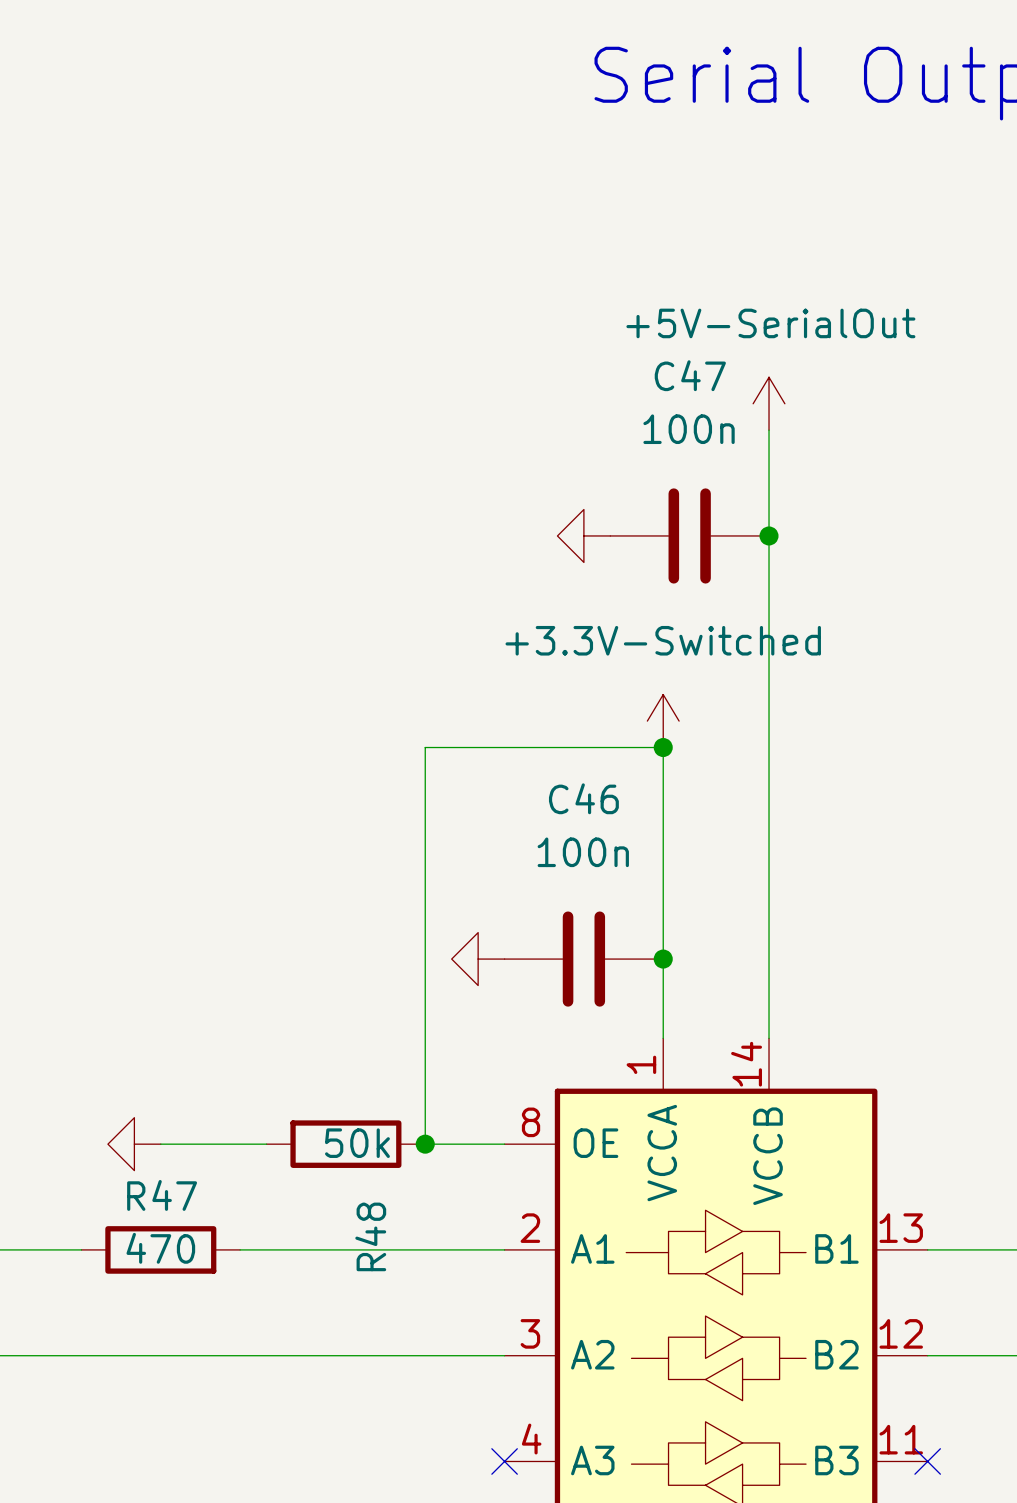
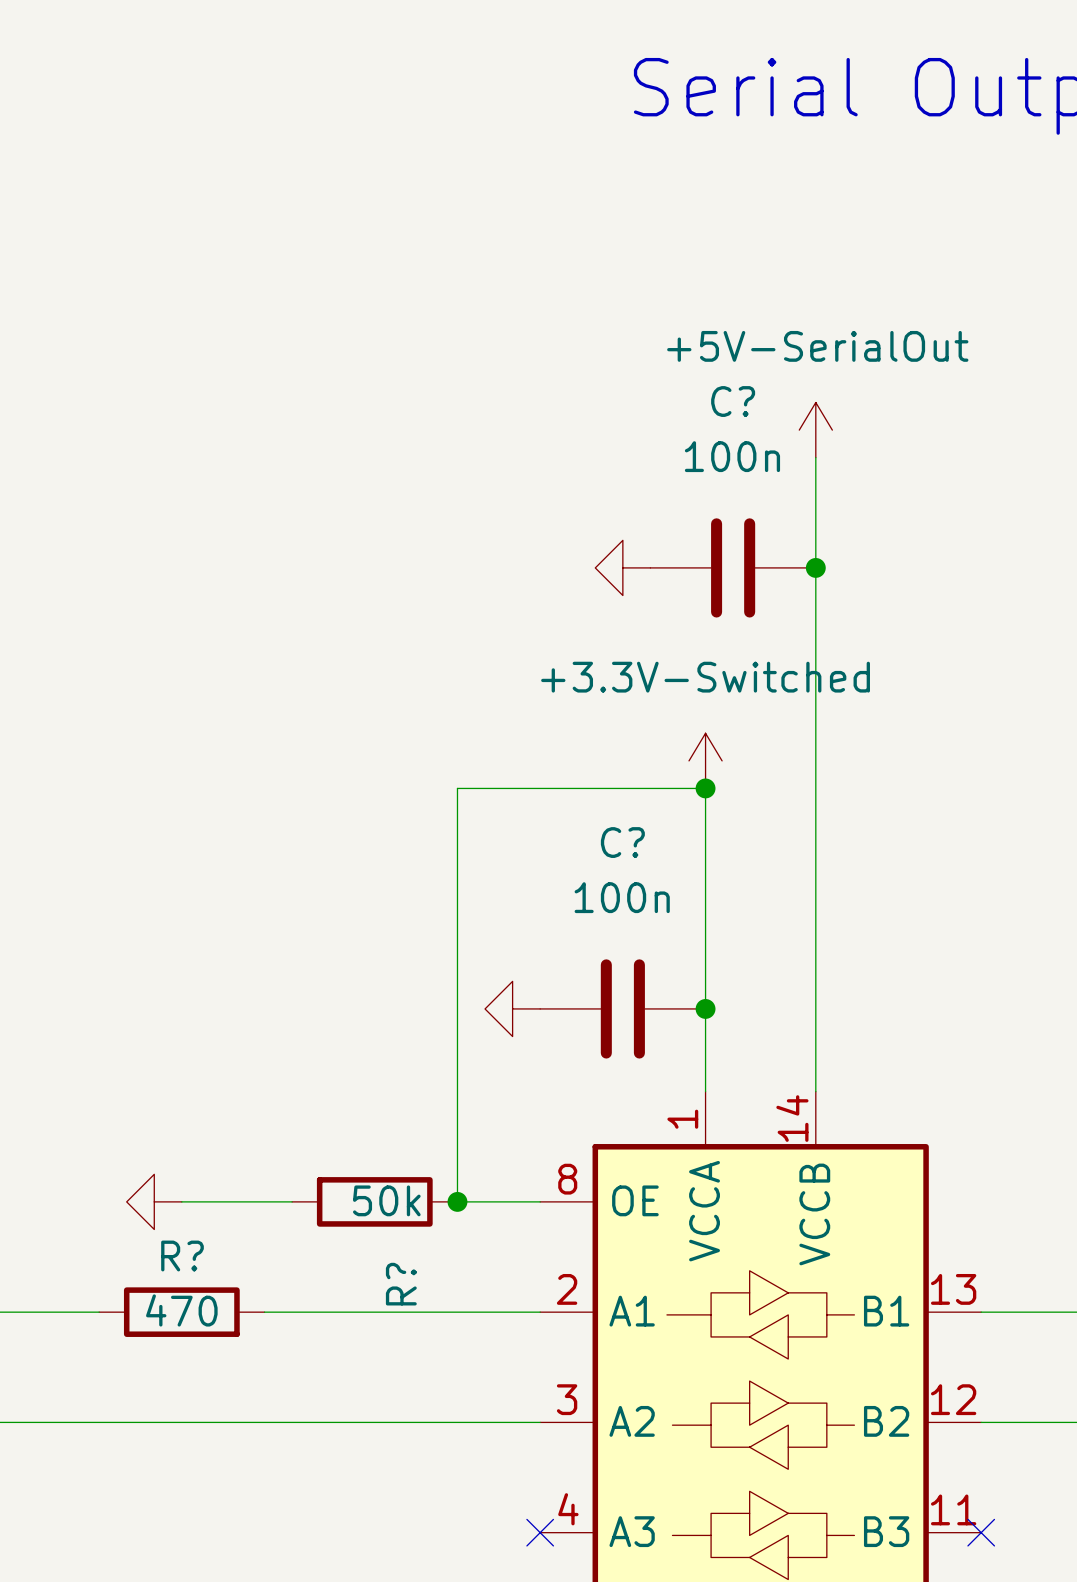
C47 name: C47 (690, 375) -> C? (733, 401)
C46 name: C46 (583, 798) -> C? (622, 842)
R47 name: R47 (162, 1195) -> R? (182, 1256)
R48 name: R48 (370, 1236) -> R? (401, 1284)

